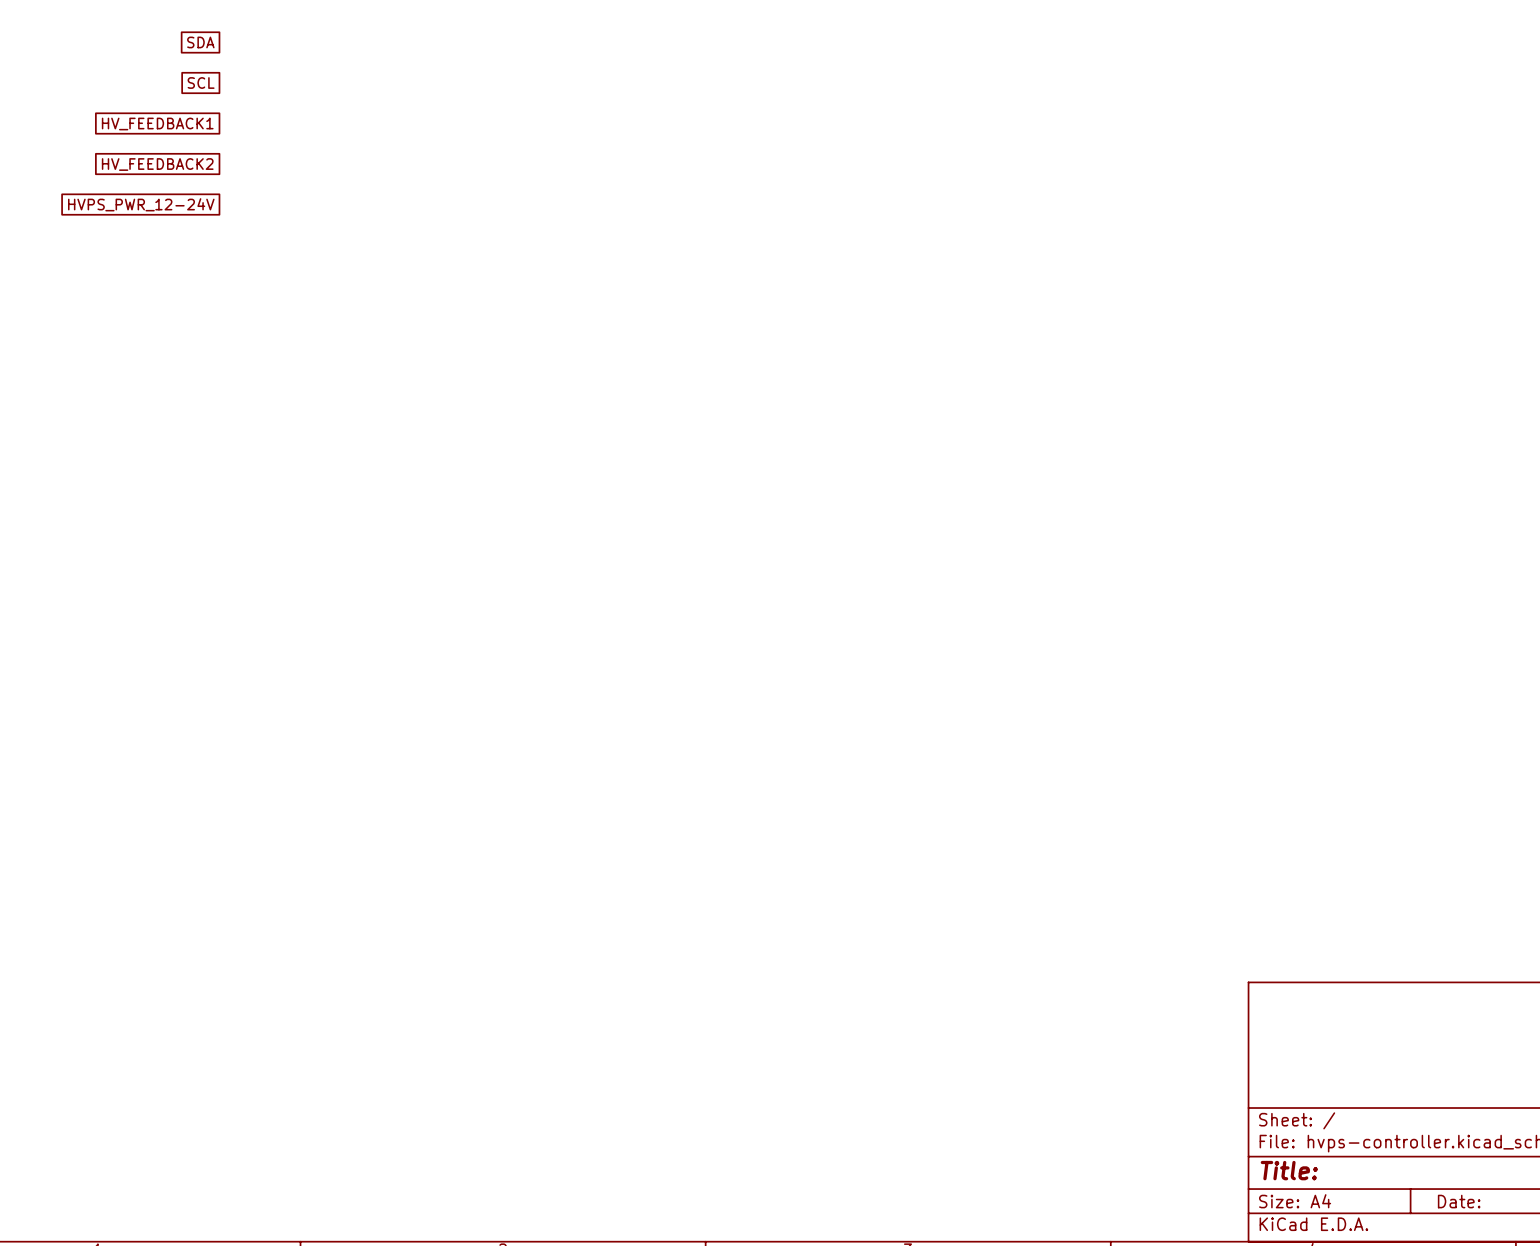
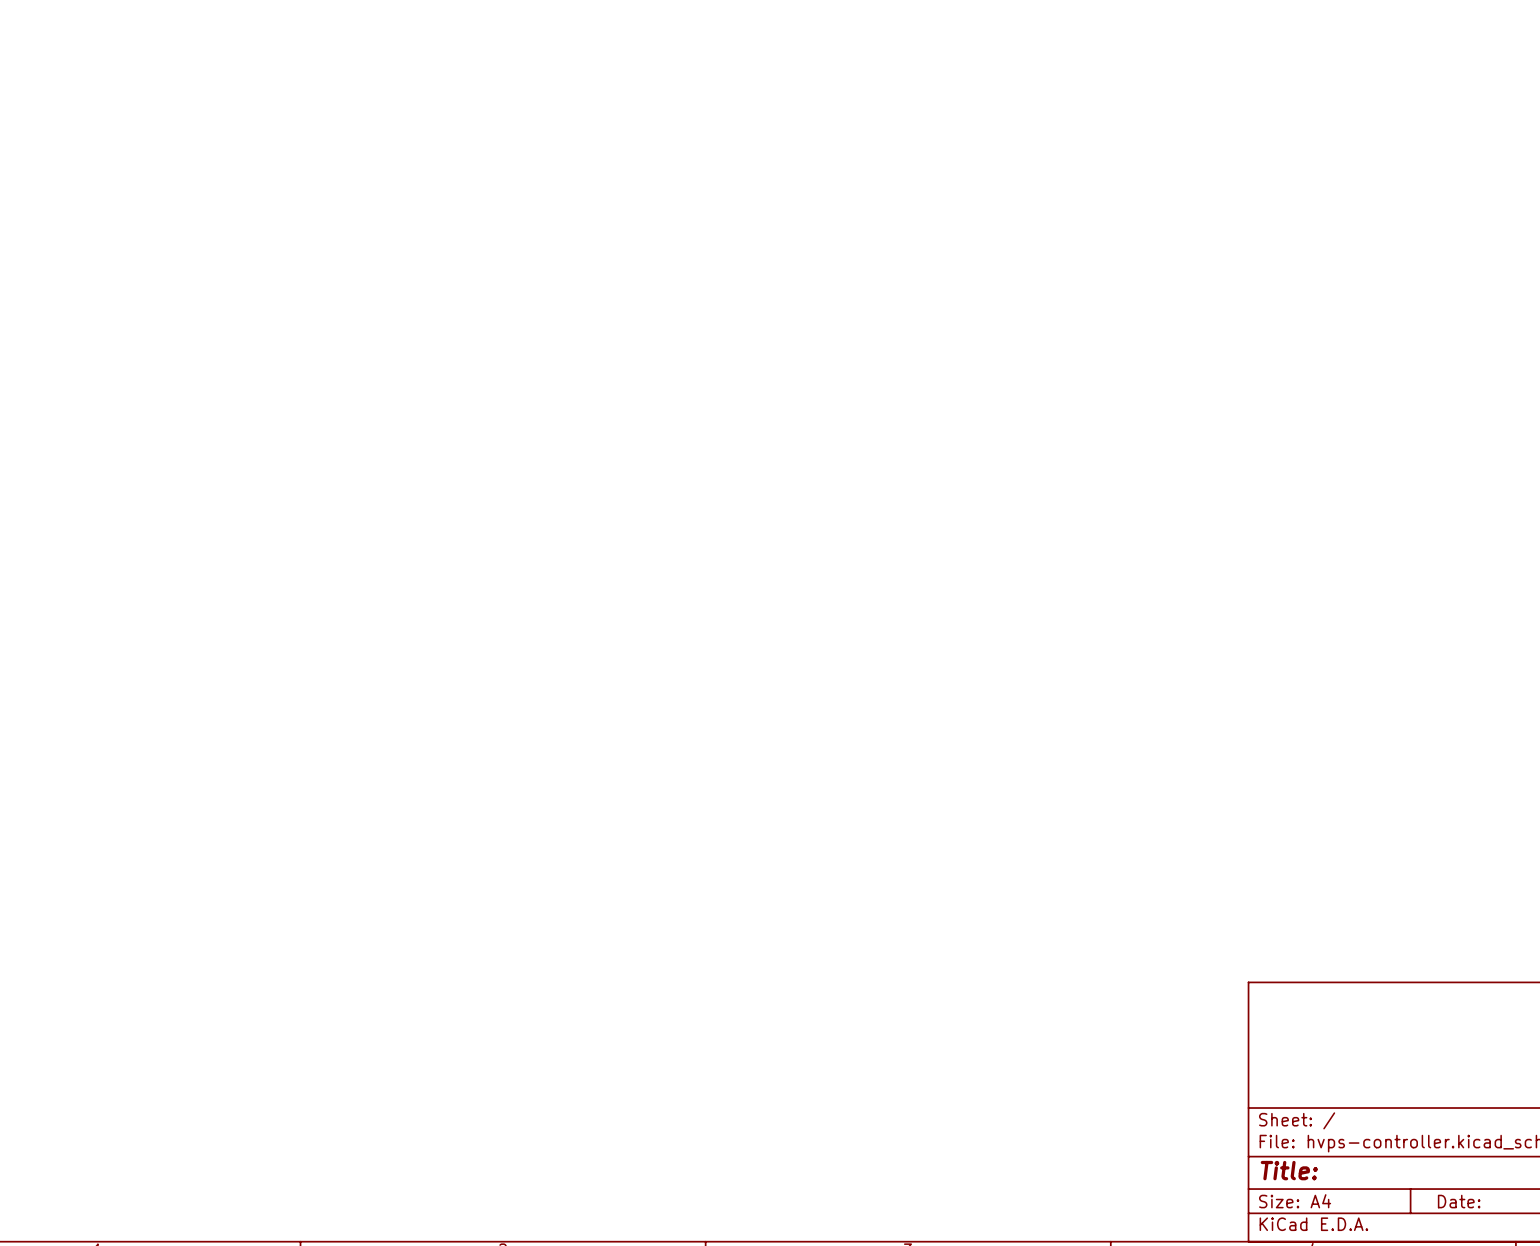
global label: SDA (200, 42) -> none
global label: SCL (201, 82) -> none
global label: HV_FEEDBACK1 (157, 124) -> none
global label: HV_FEEDBACK2 (157, 164) -> none
global label: HVPS_PWR_12-24V (141, 204) -> none

